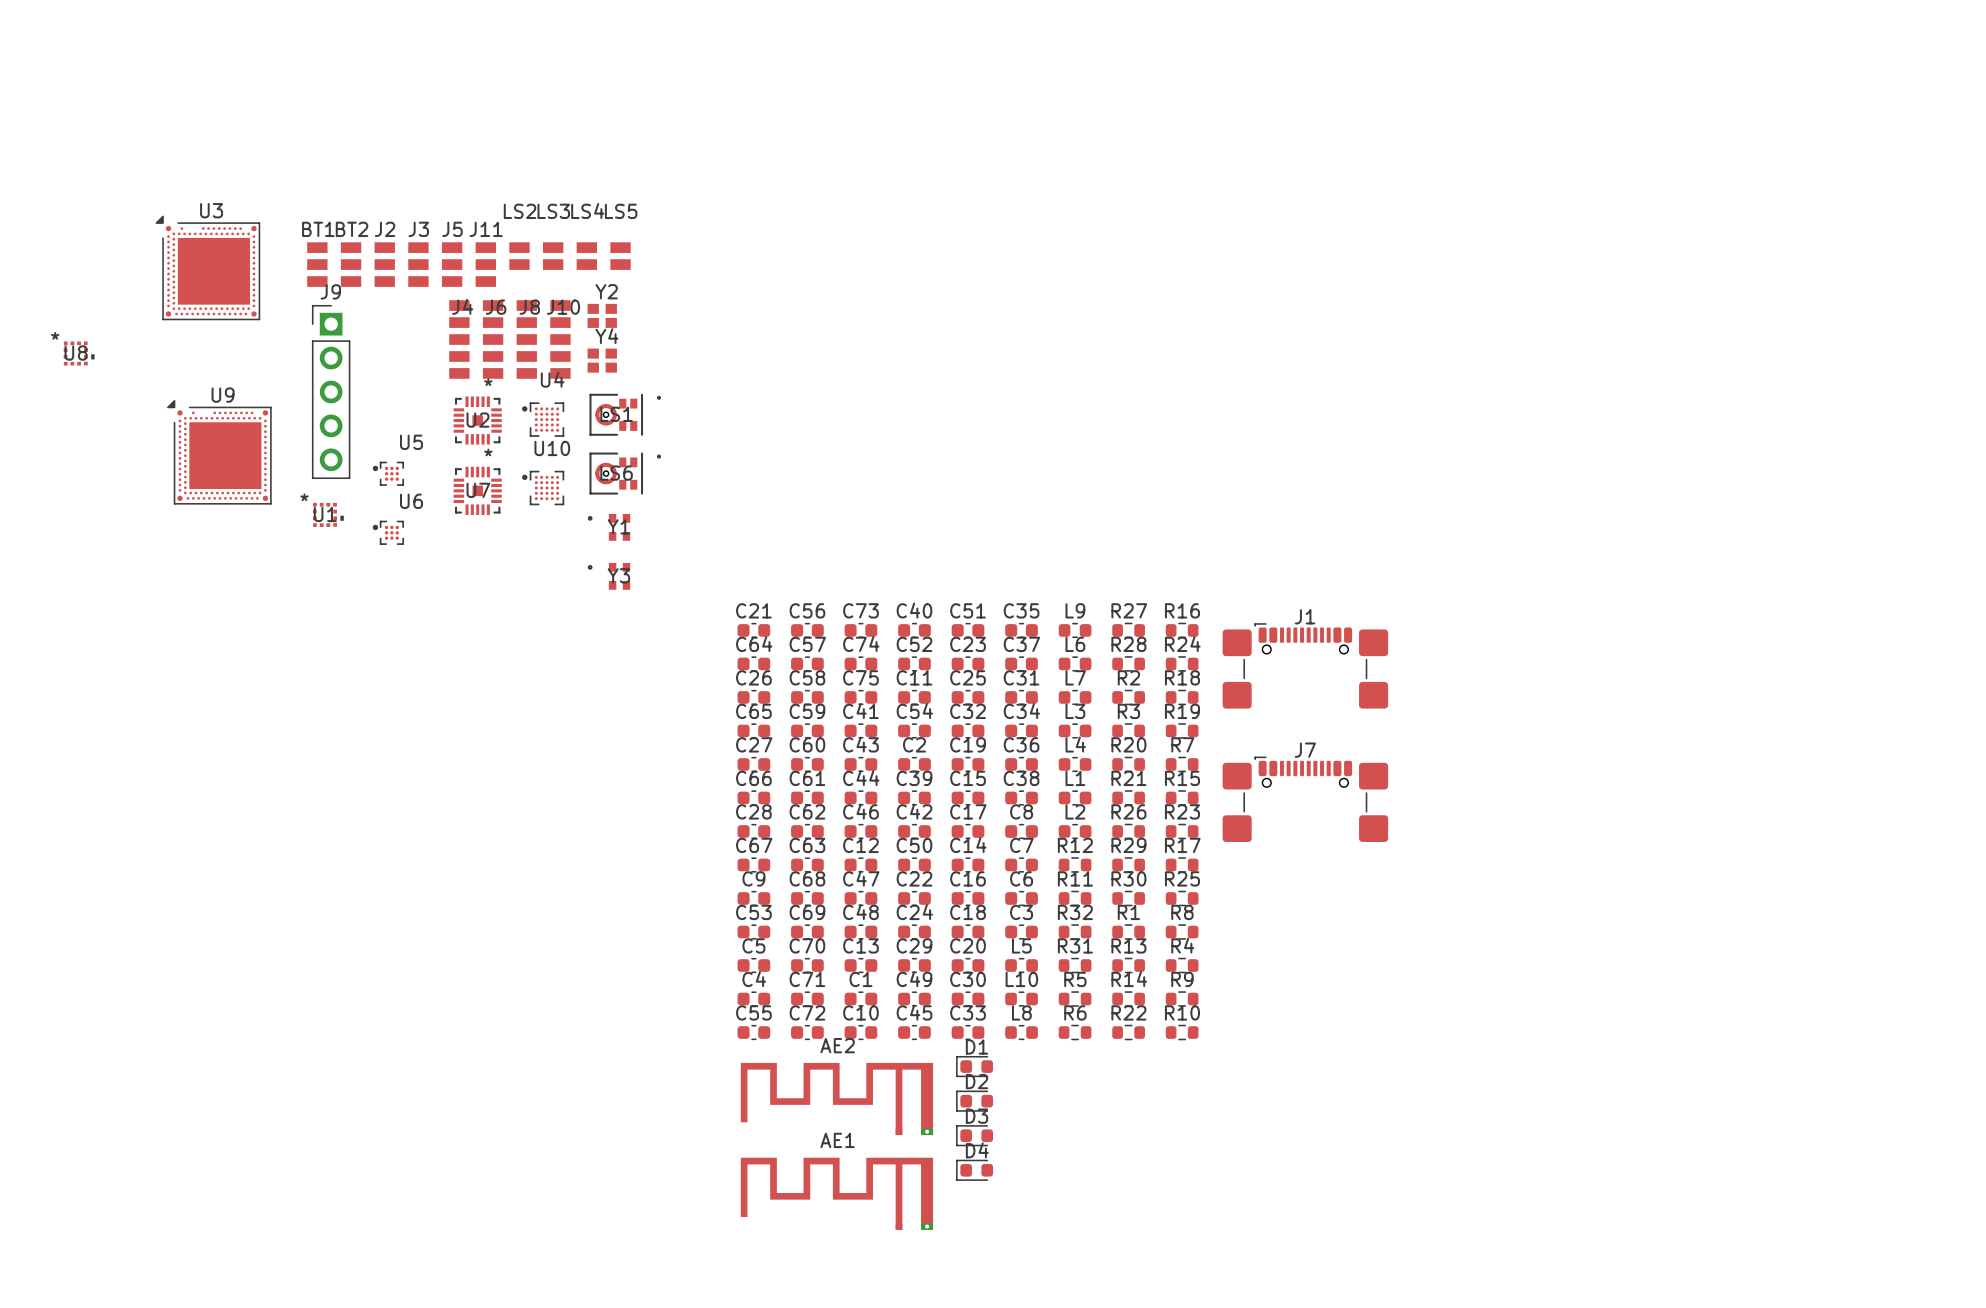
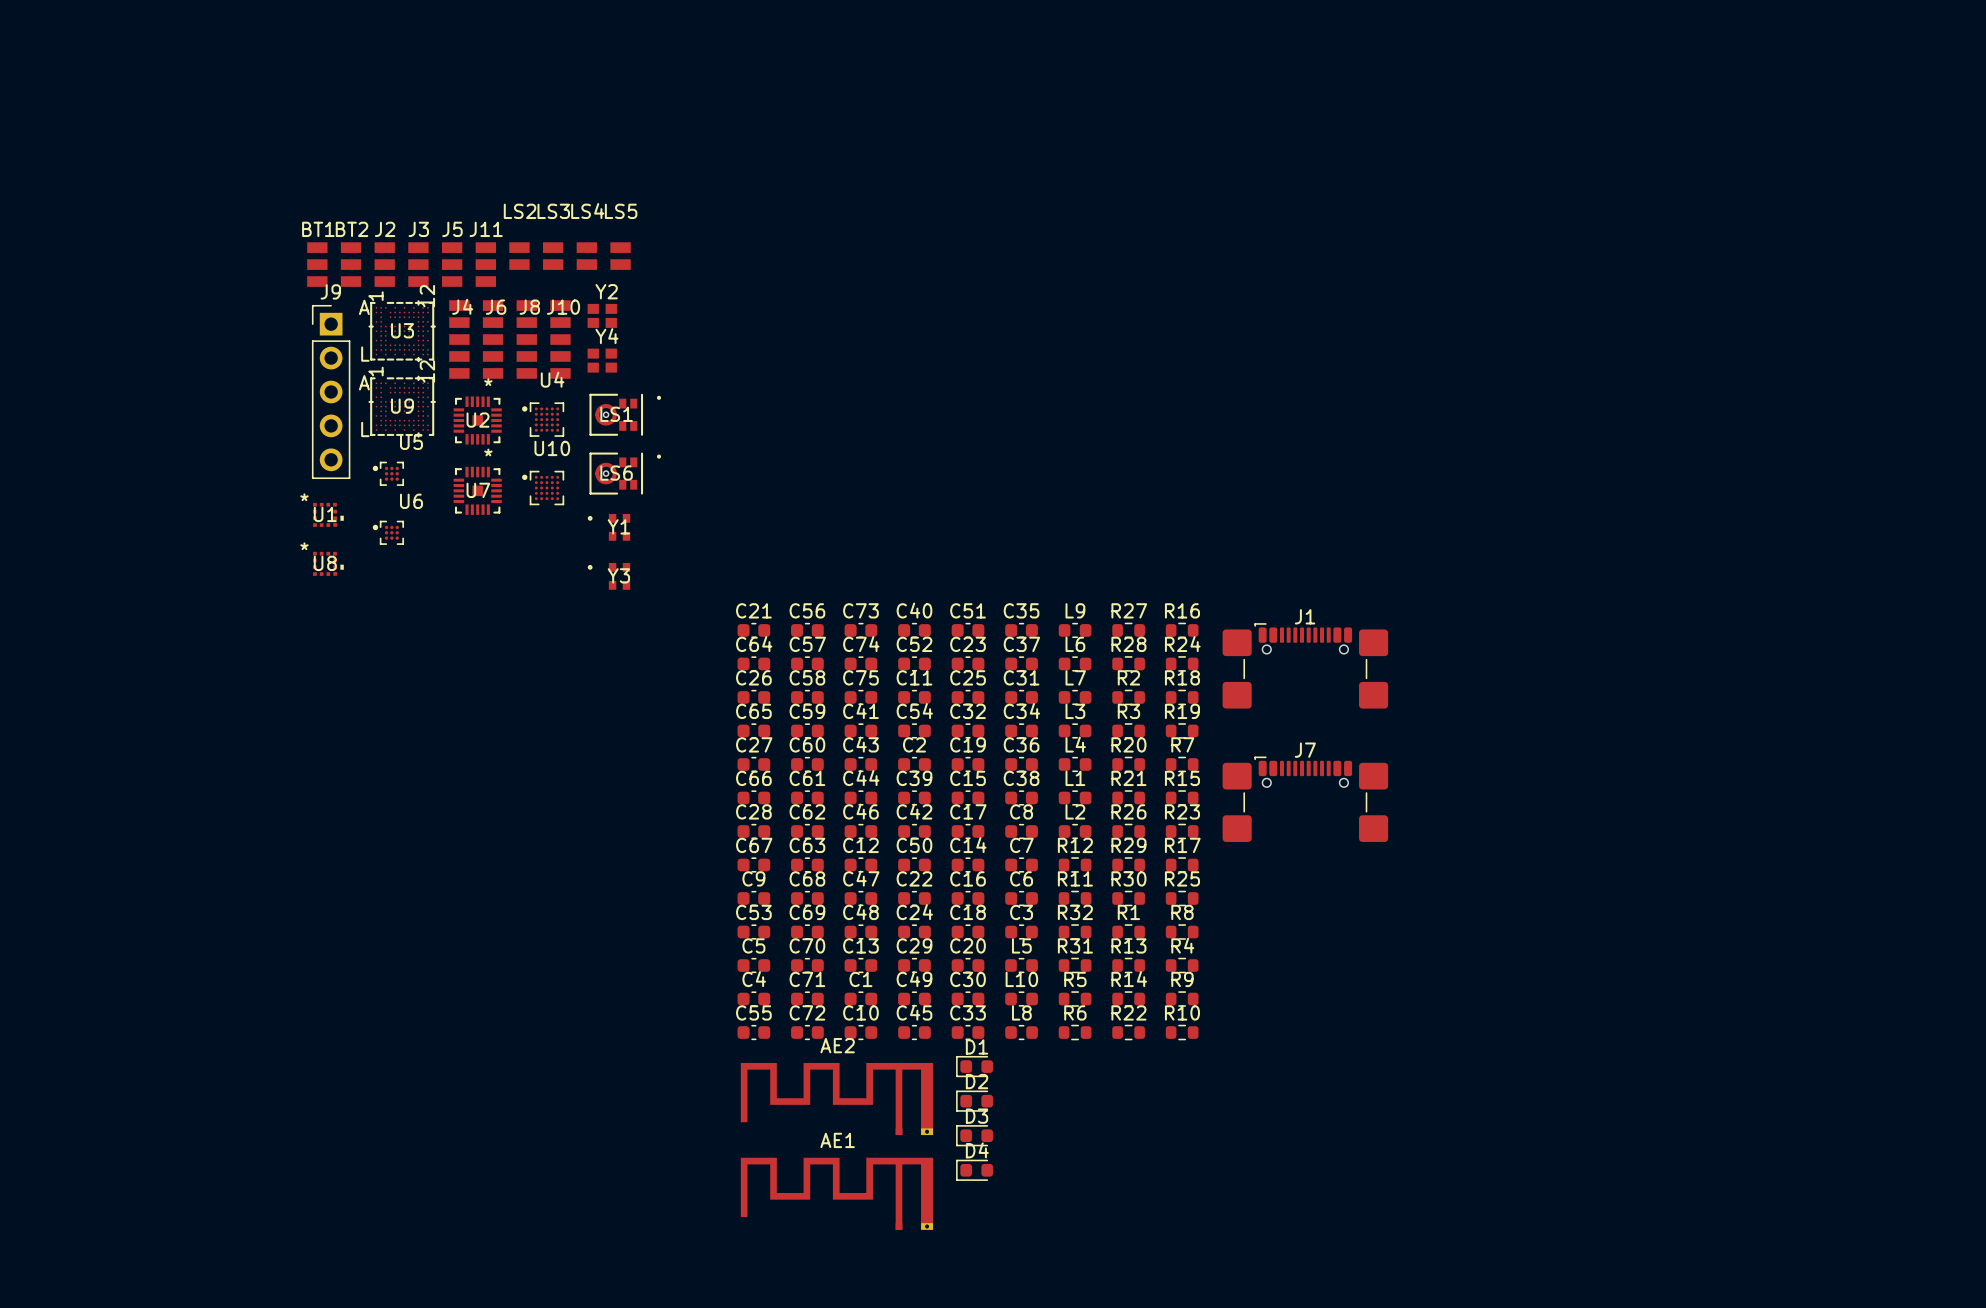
U3 name position: U3 (211, 210) -> U3 (402, 330)
U3 footprint: [155, 215, 261, 321] -> [368, 300, 436, 363]
U8 position: (79, 353) -> (328, 563)
U9 name position: U9 (223, 395) -> U9 (402, 406)
U9 footprint: [167, 399, 272, 505] -> [368, 375, 436, 438]

